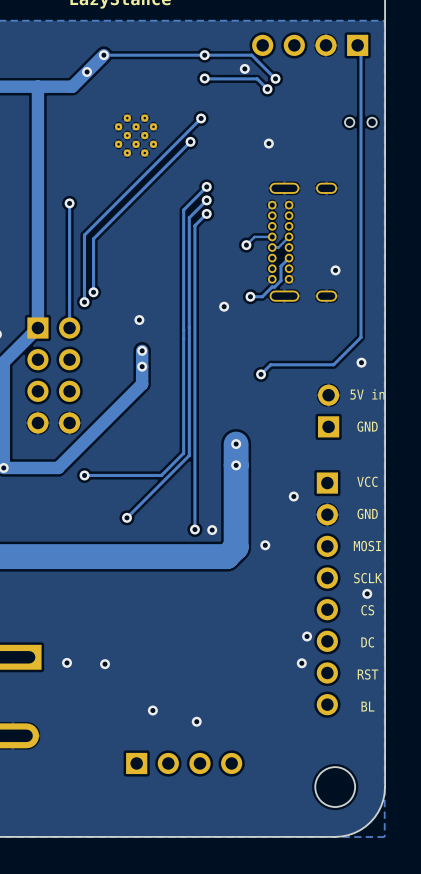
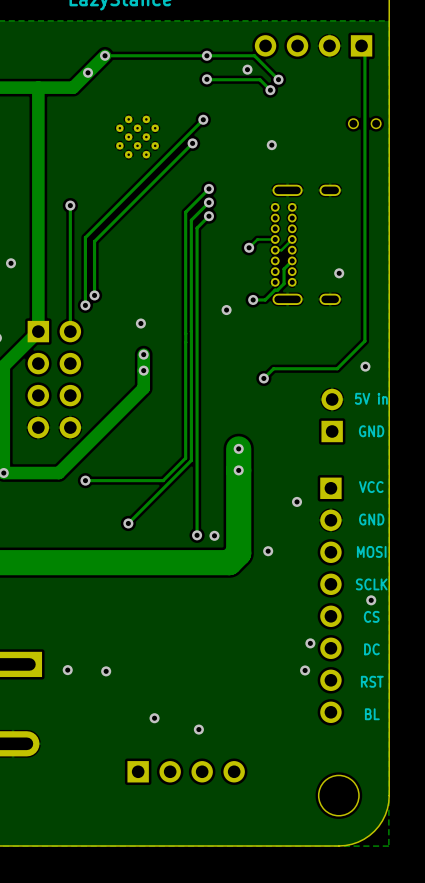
via: none -> (11, 263)

